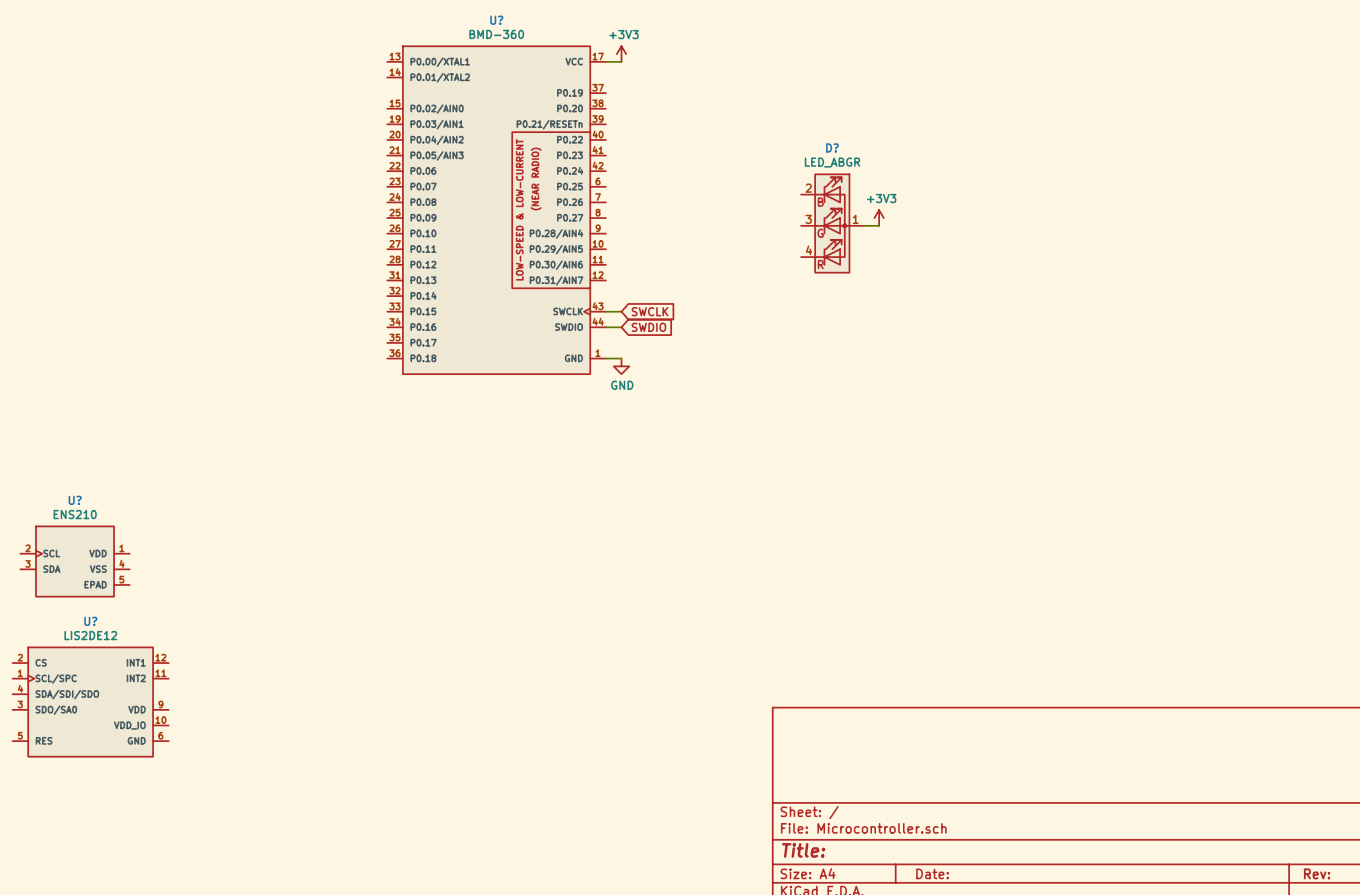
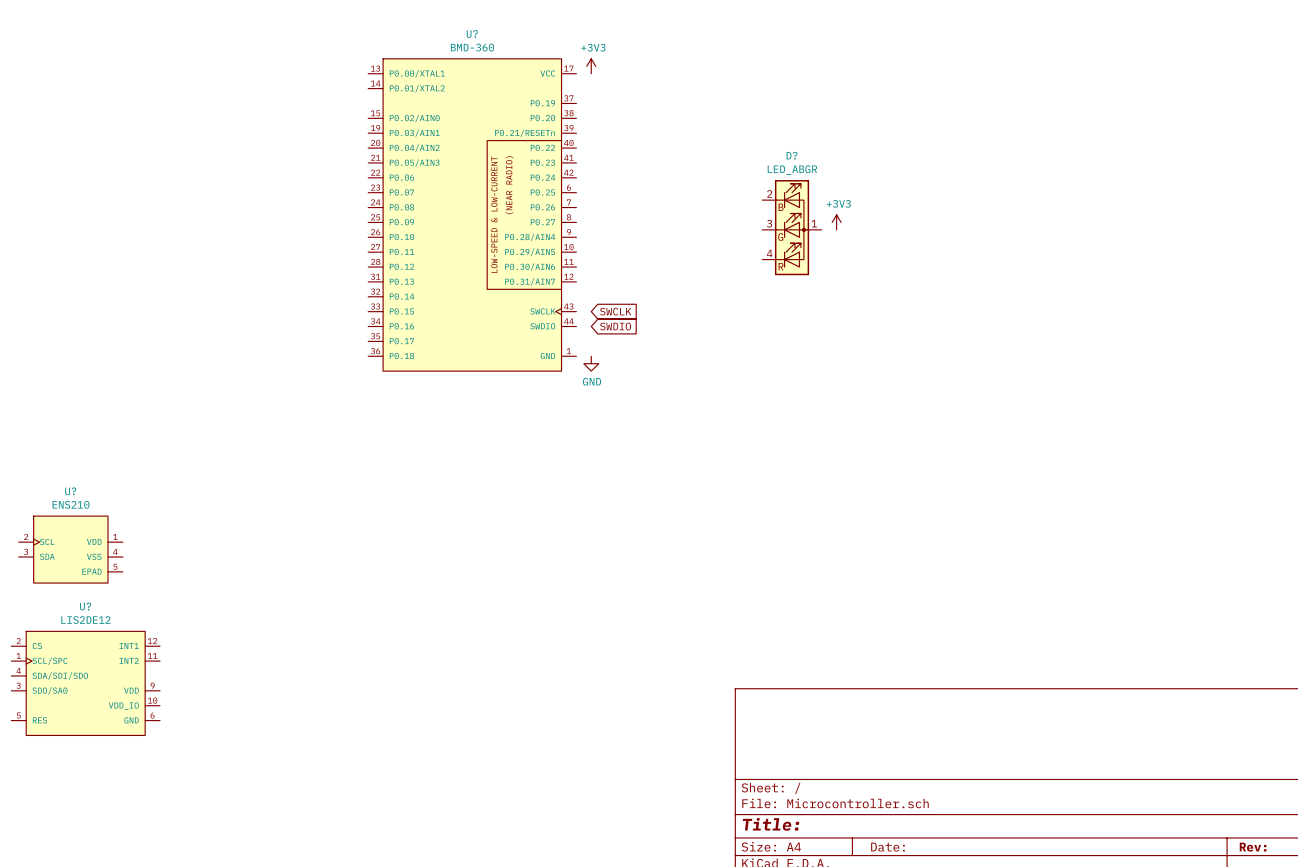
wire: (605, 61) (621, 61) -> none
wire: (863, 225) (879, 225) -> none
wire: (605, 311) (621, 311) -> none
wire: (605, 327) (621, 327) -> none
wire: (605, 358) (621, 358) -> none

